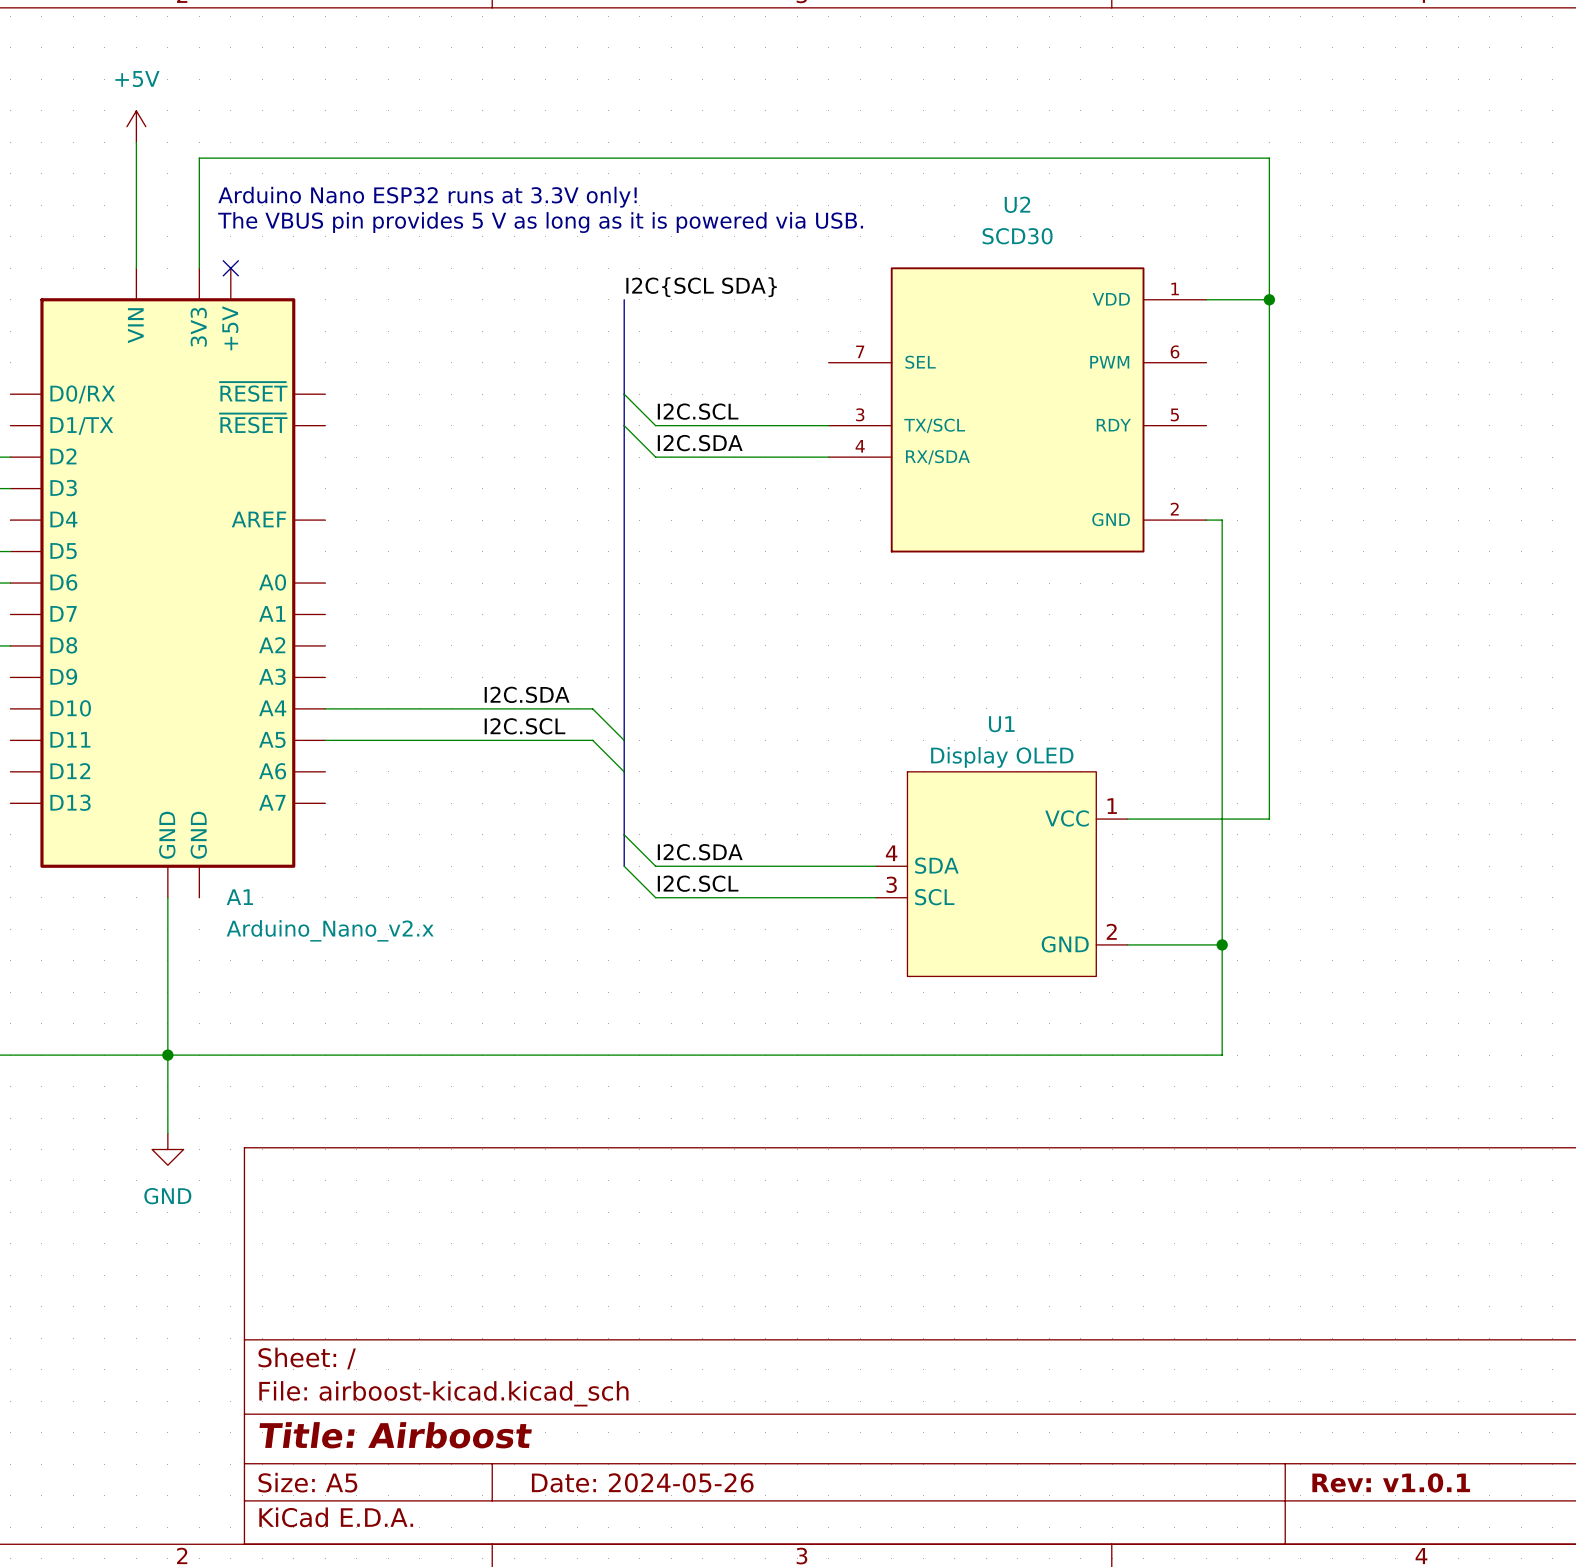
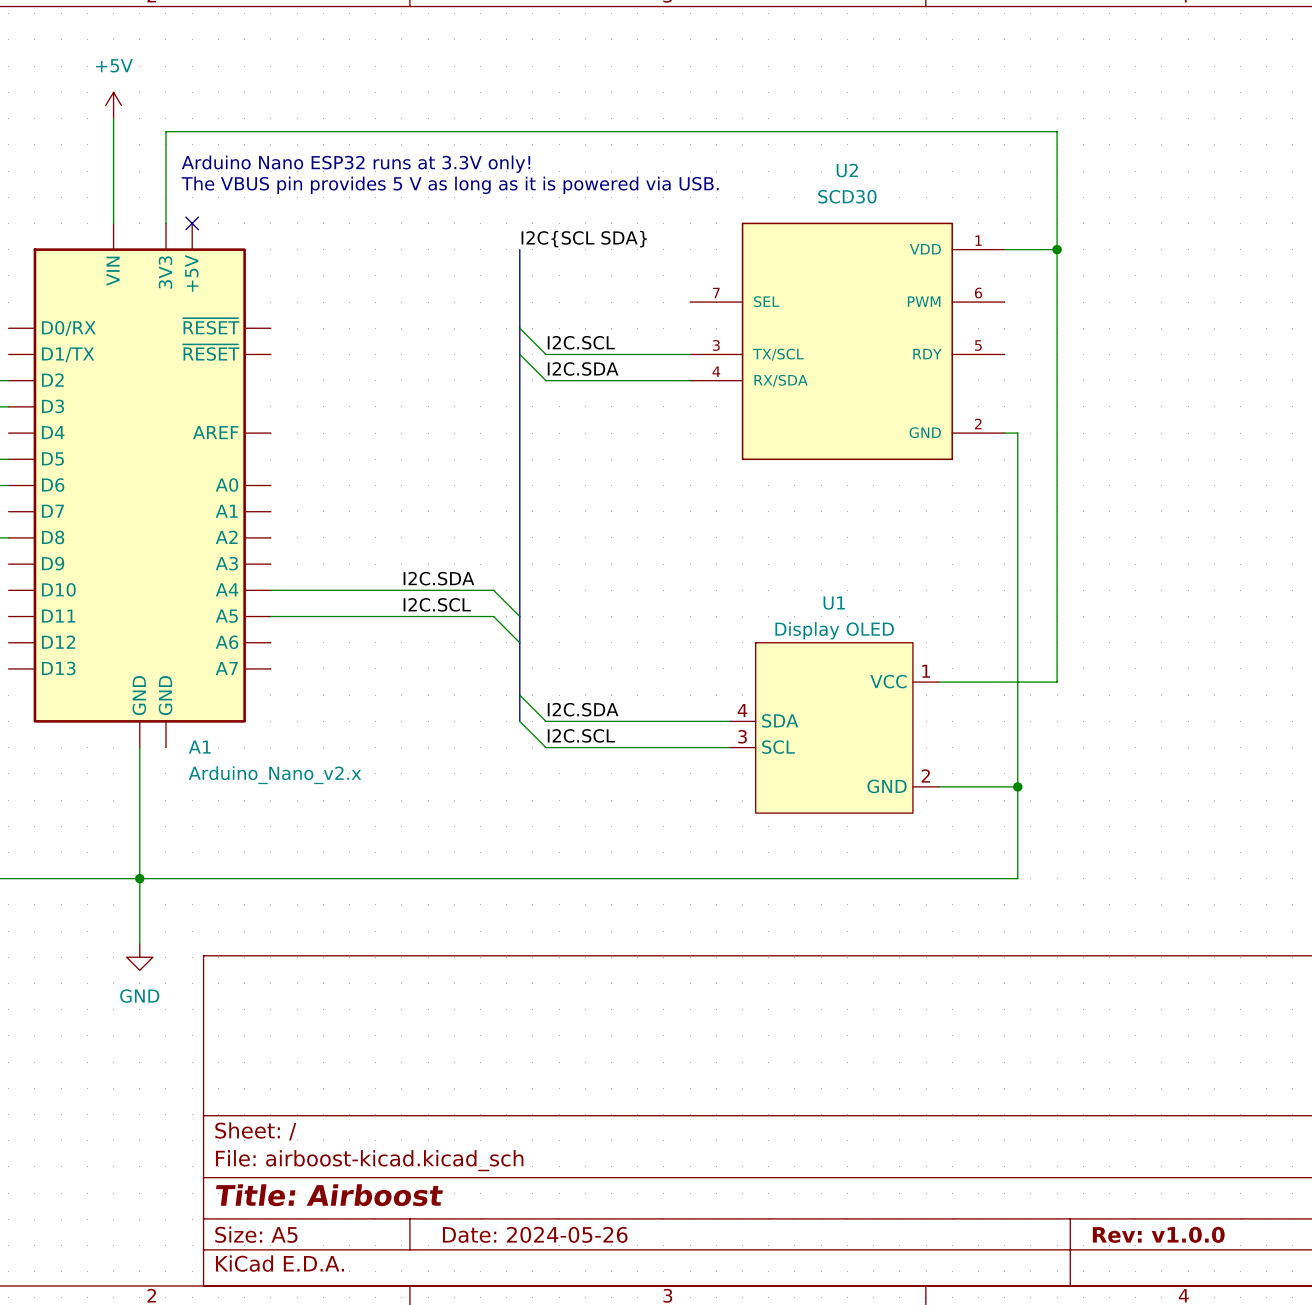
title block: Rev: v1.0.1 (1391, 1482) -> Rev: v1.0.0 (1158, 1234)

